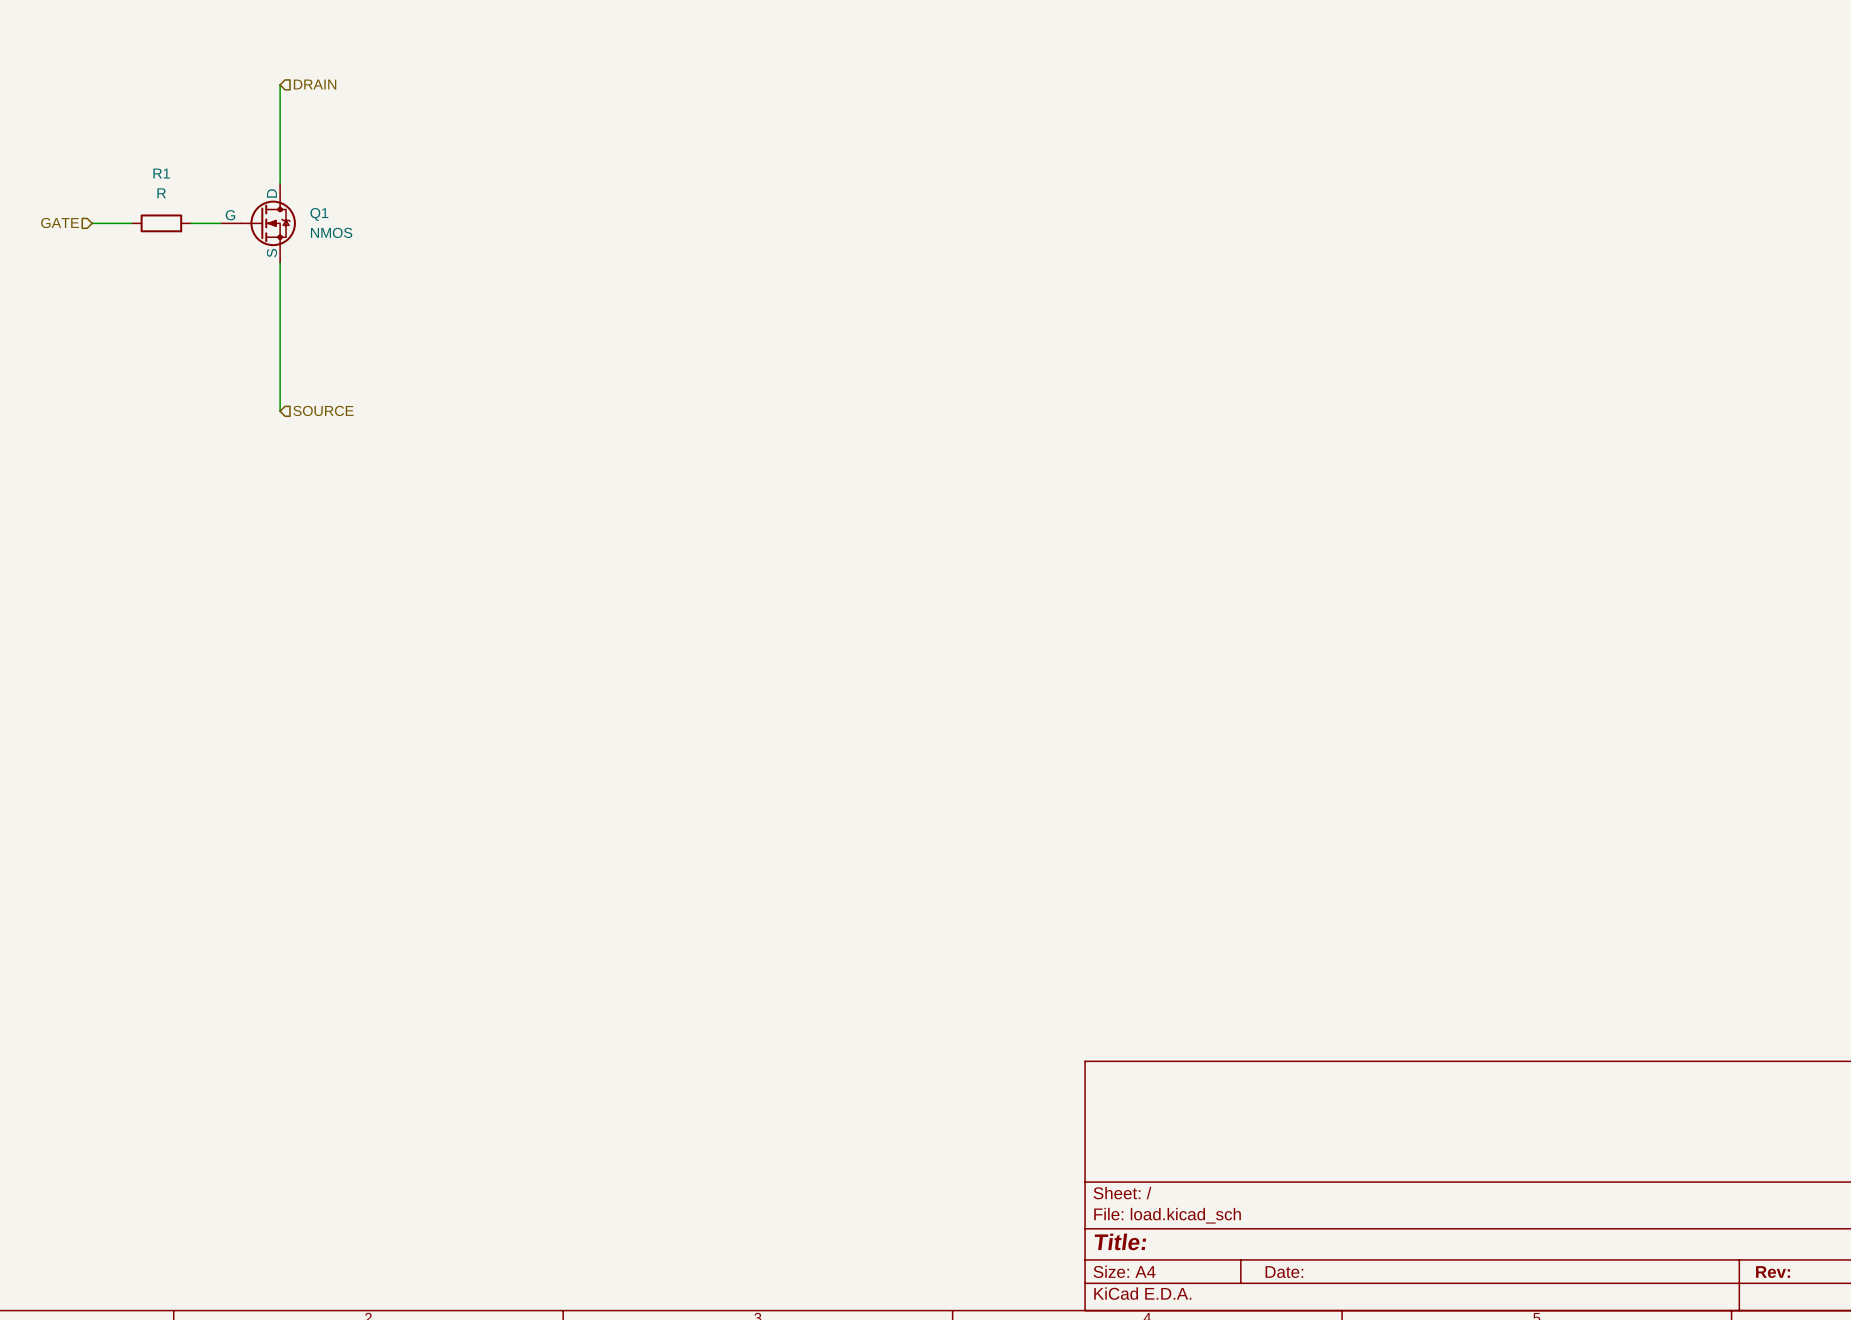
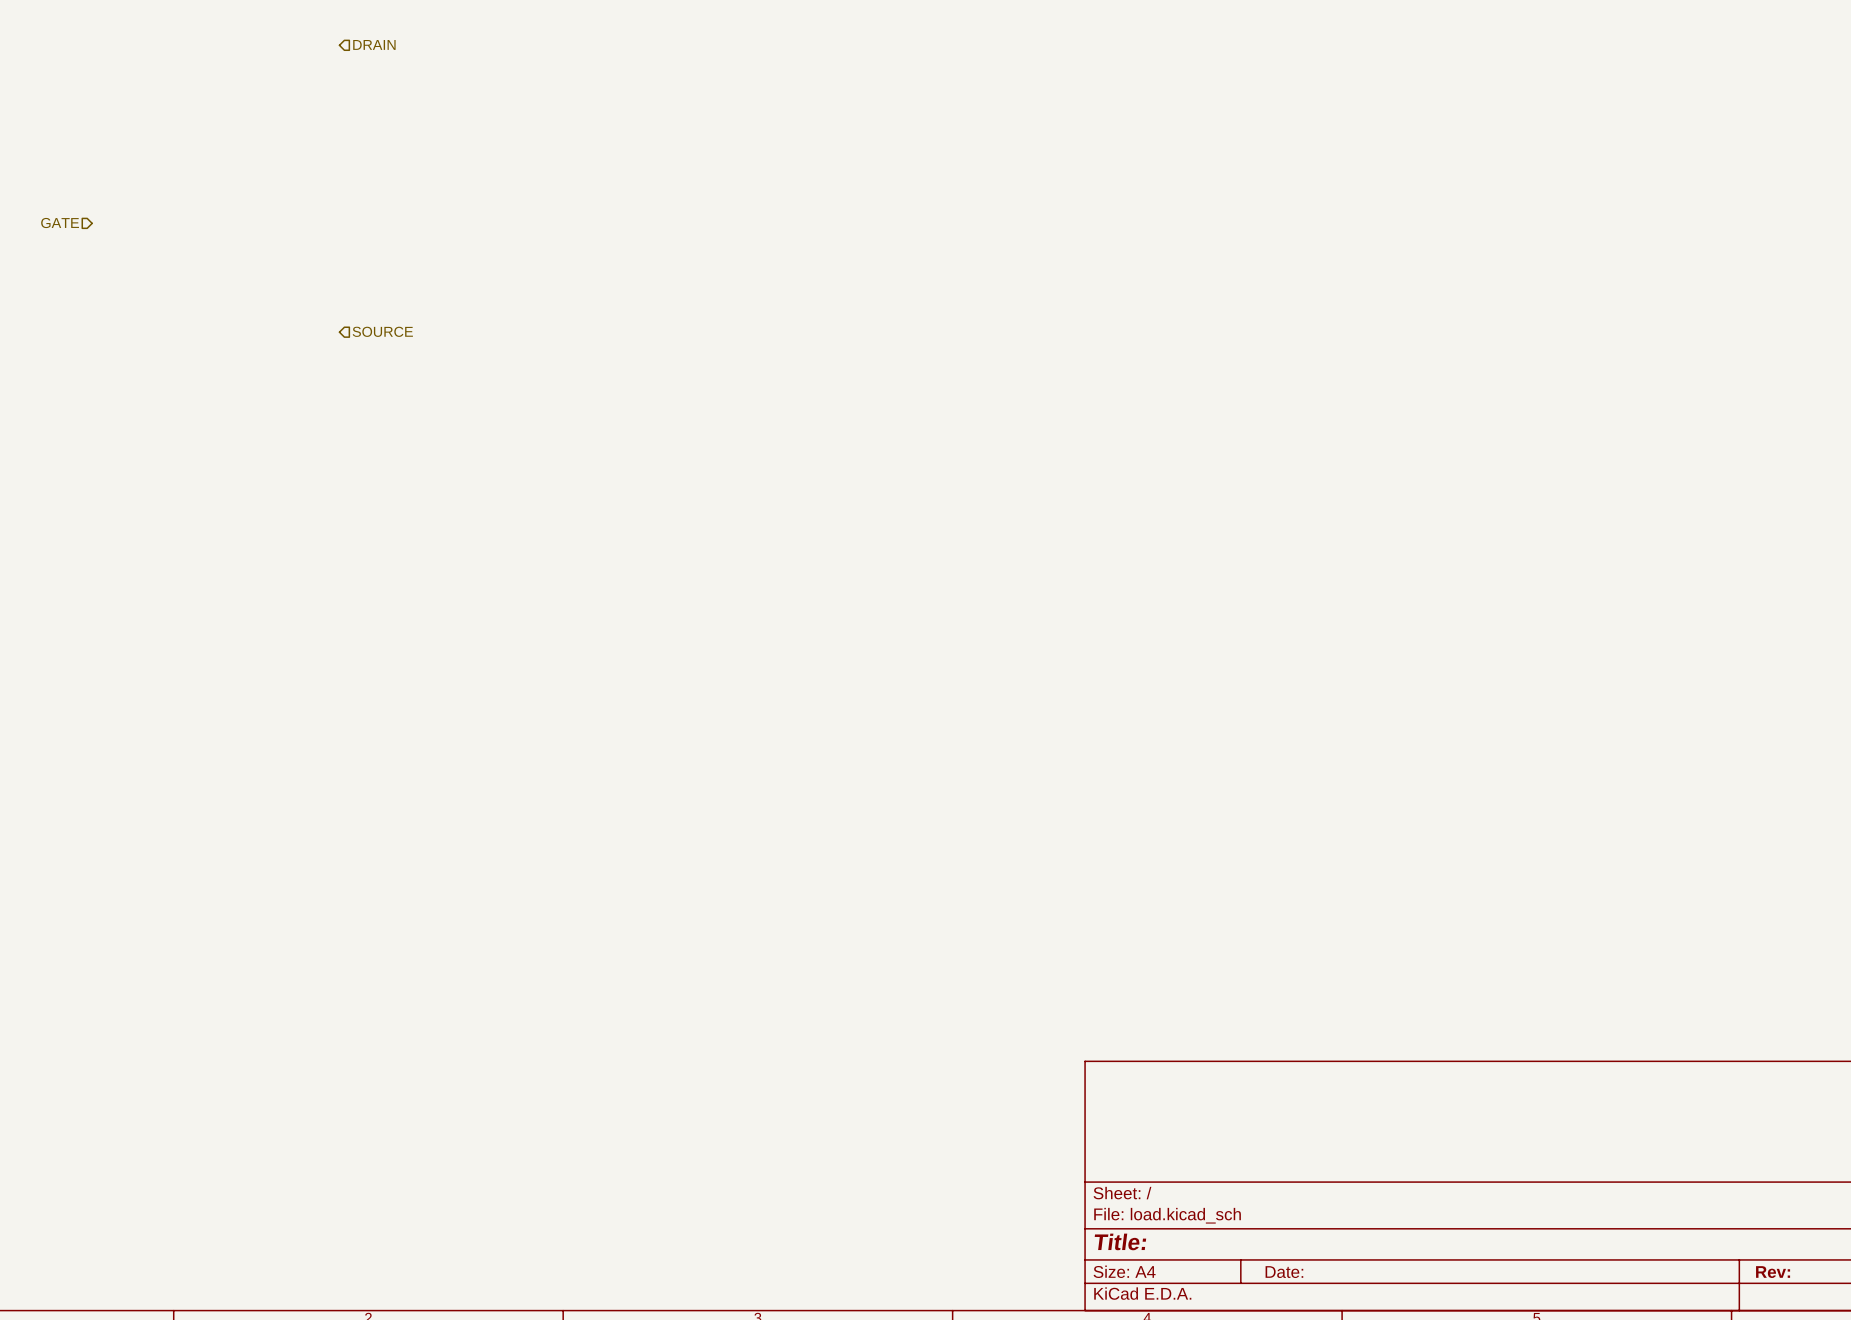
wire: (280, 84) (280, 183) -> none
hierarchical label position: DRAIN (315, 84) -> DRAIN (374, 44)
wire: (92, 223) (131, 223) -> none
R1: R (161, 223) -> none
wire: (191, 223) (220, 223) -> none
Q1: NMOS (258, 223) -> none
wire: (280, 262) (280, 411) -> none
hierarchical label position: SOURCE (323, 410) -> SOURCE (382, 331)

